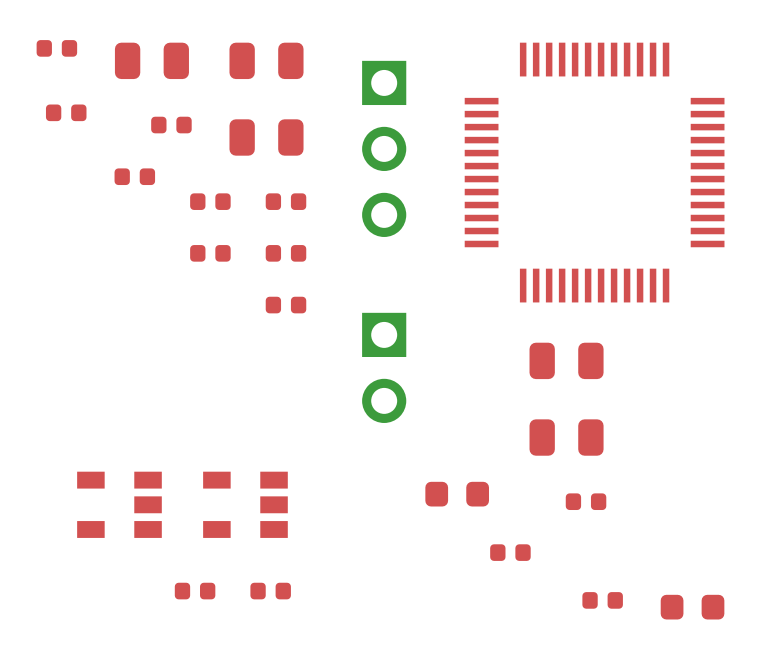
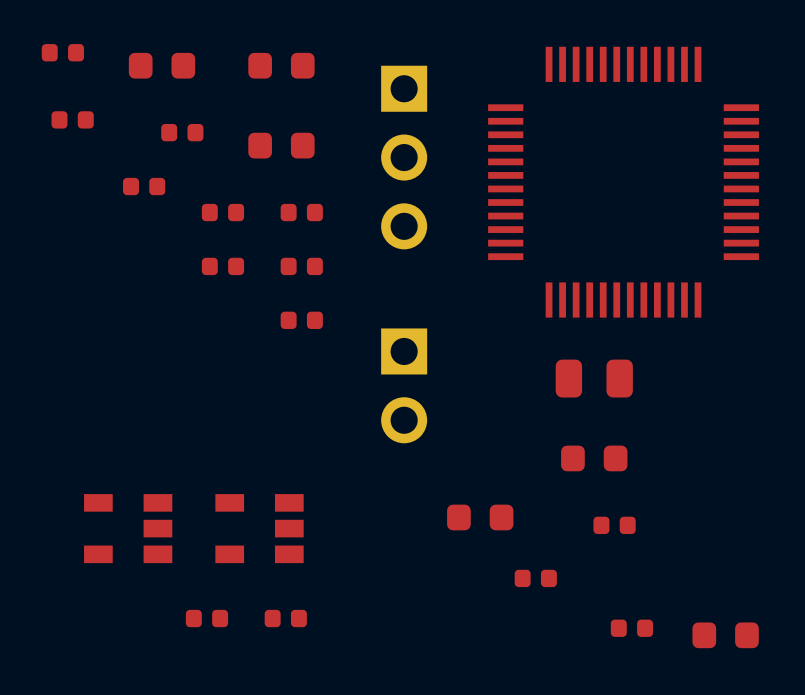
part footprint: [114, 42, 189, 80] -> [128, 52, 196, 79]
part footprint: [229, 42, 304, 80] -> [248, 52, 315, 79]
part footprint: [229, 119, 304, 156] -> [248, 132, 315, 159]
part footprint: [529, 419, 604, 456] -> [561, 445, 628, 472]

